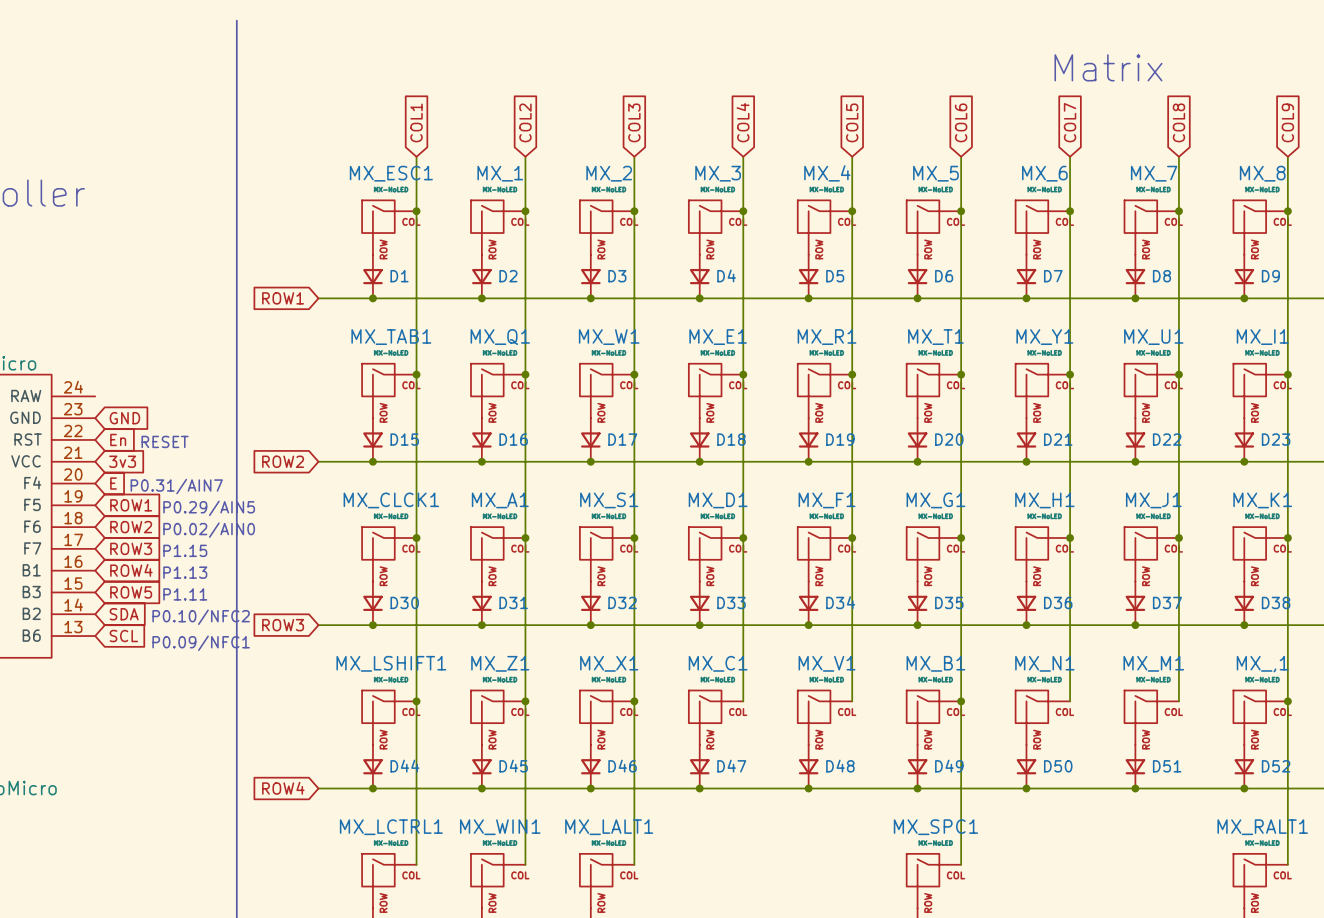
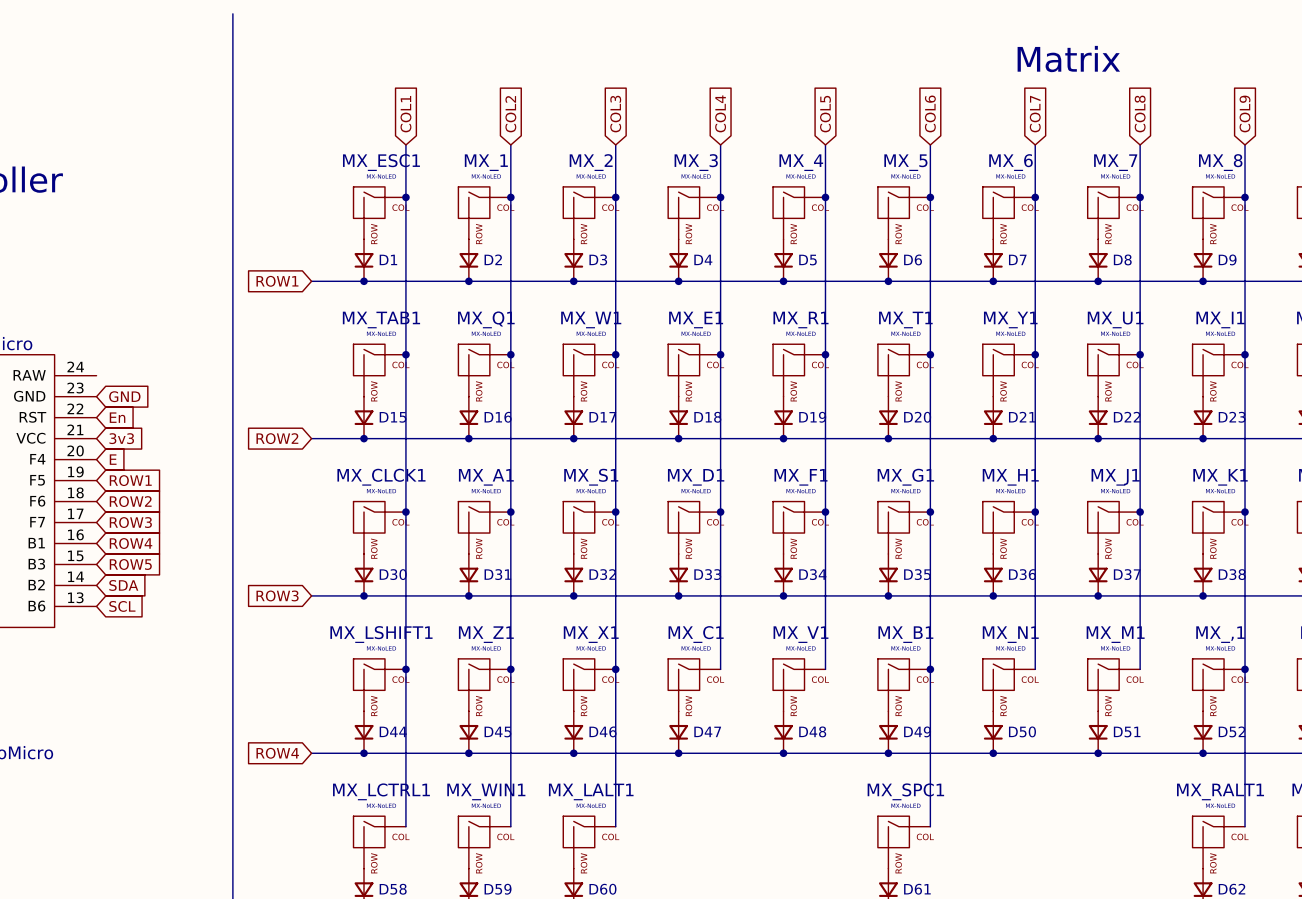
text: RESET (165, 441) -> none
text: P0.31/AIN7 (176, 486) -> none
text: P0.29/AIN5 (209, 508) -> none
text: P0.02/AIN0 (209, 530) -> none
text: P1.15 (185, 550) -> none
text: P1.13 (185, 572) -> none
text: P1.11 (185, 594) -> none
text: P0.10/NFC2 (201, 617) -> none
text: P0.09/NFC1 (201, 643) -> none

